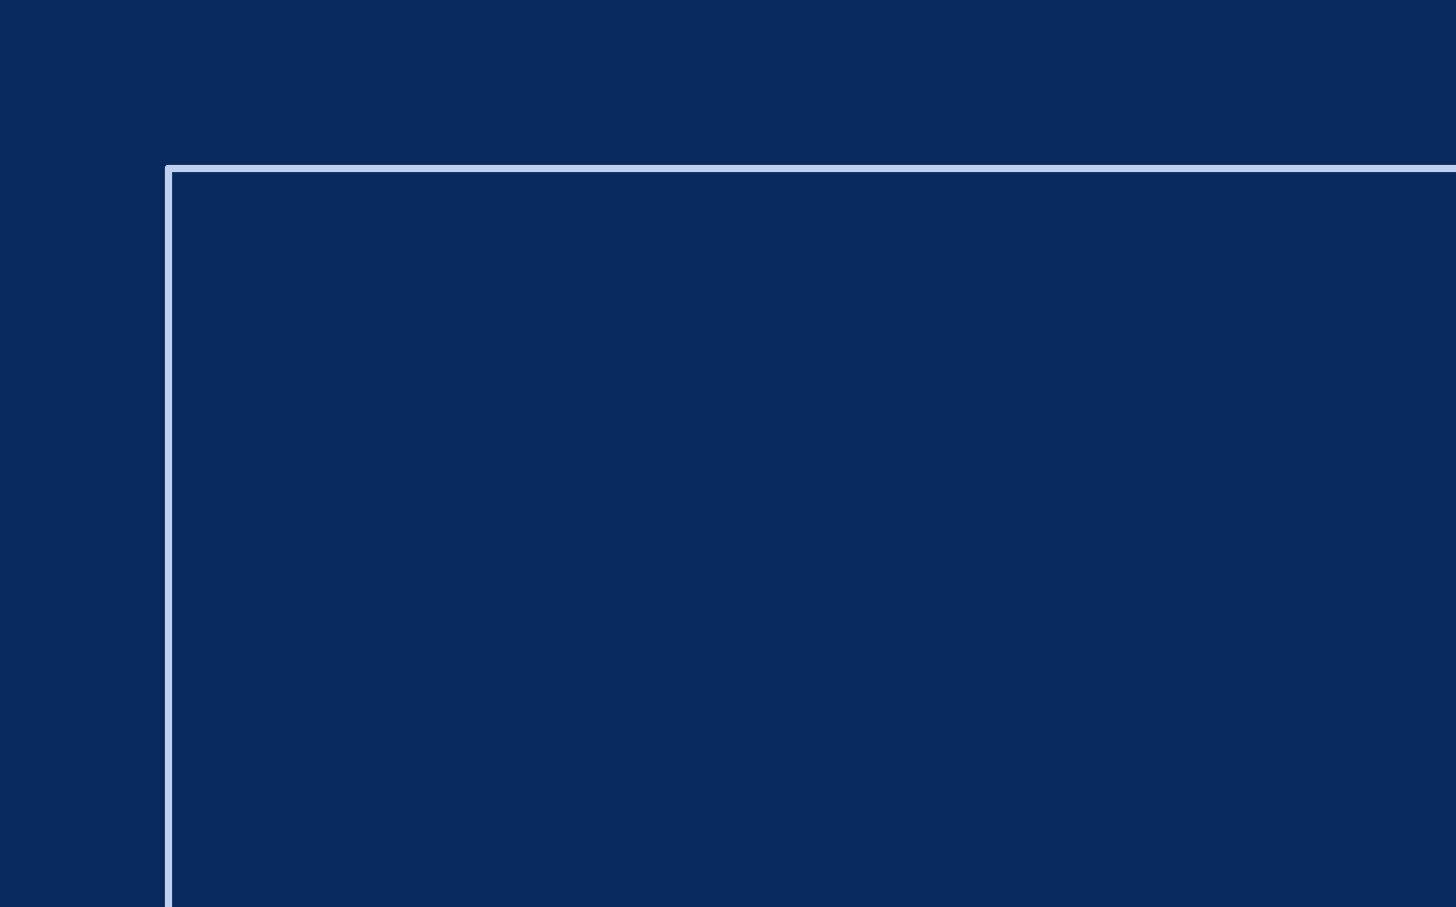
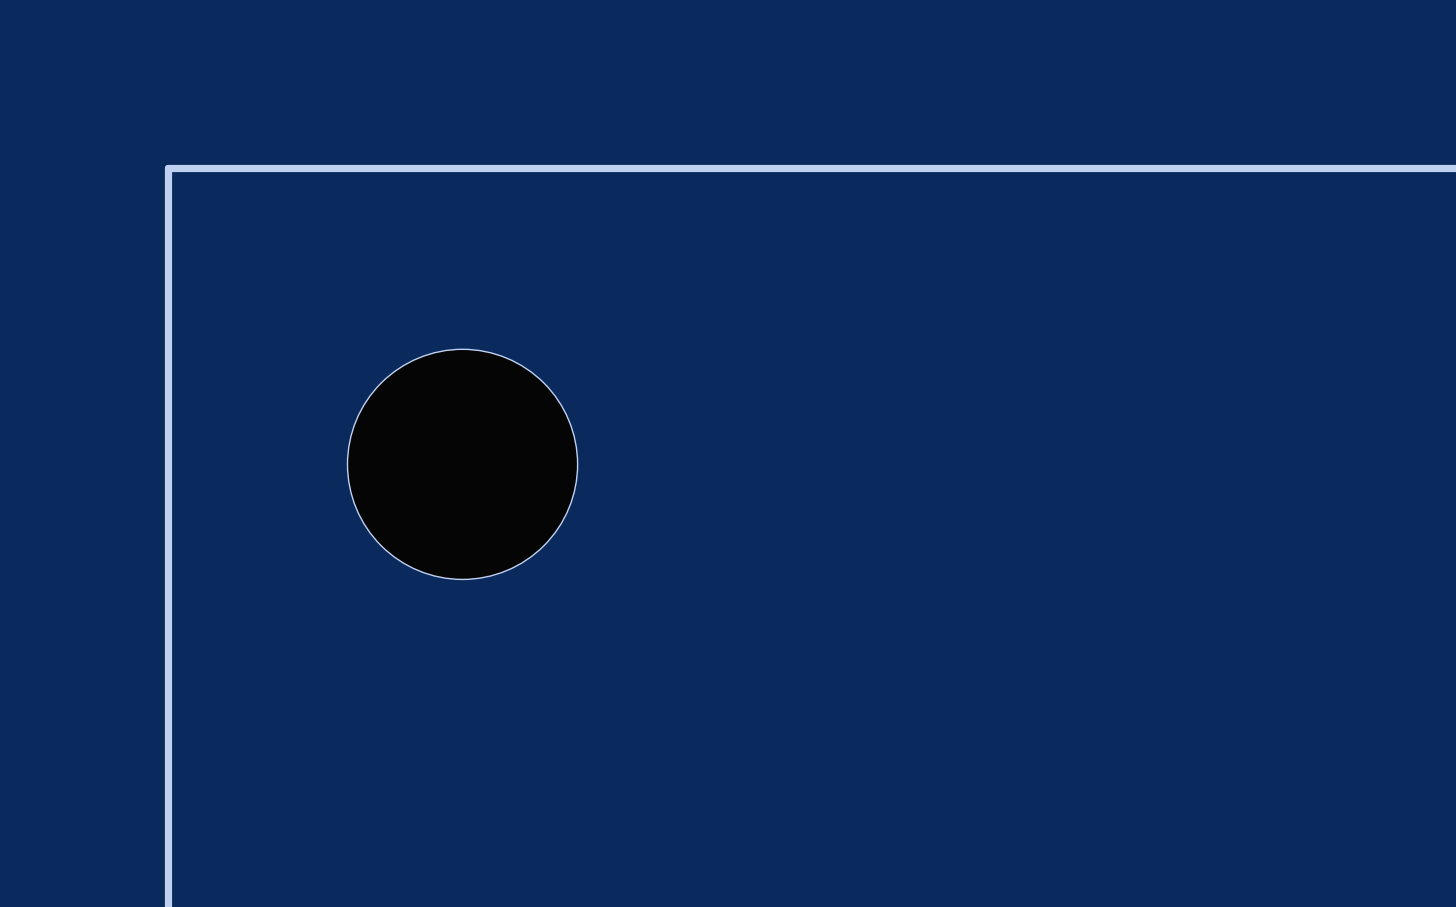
part: none -> (462, 464)

